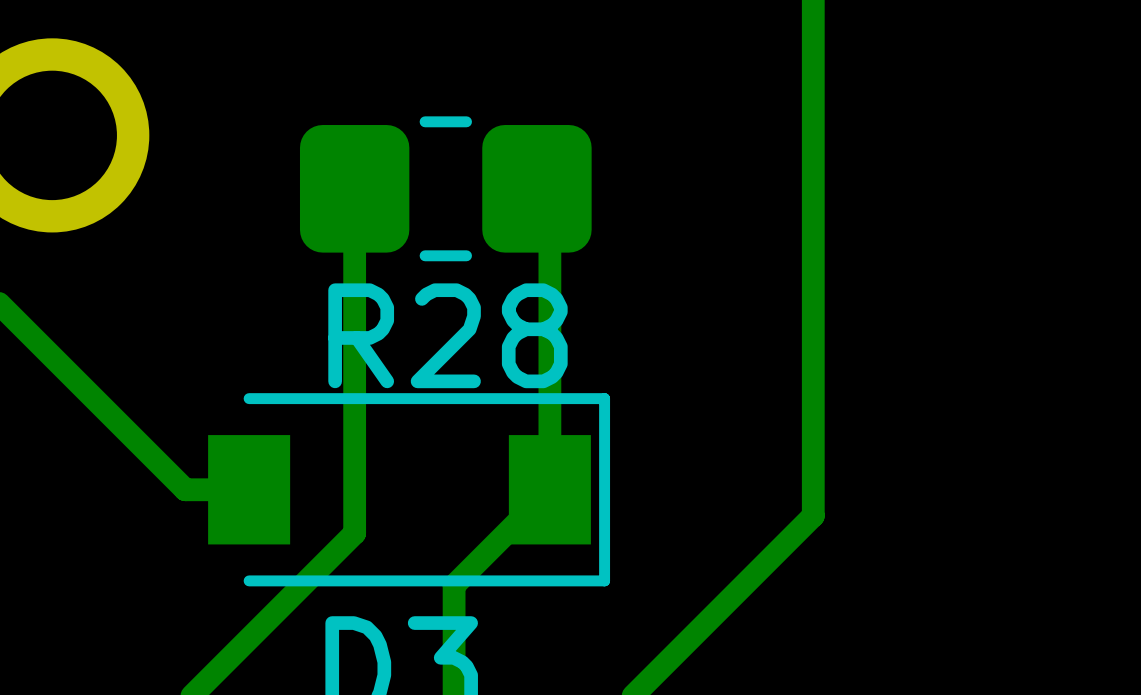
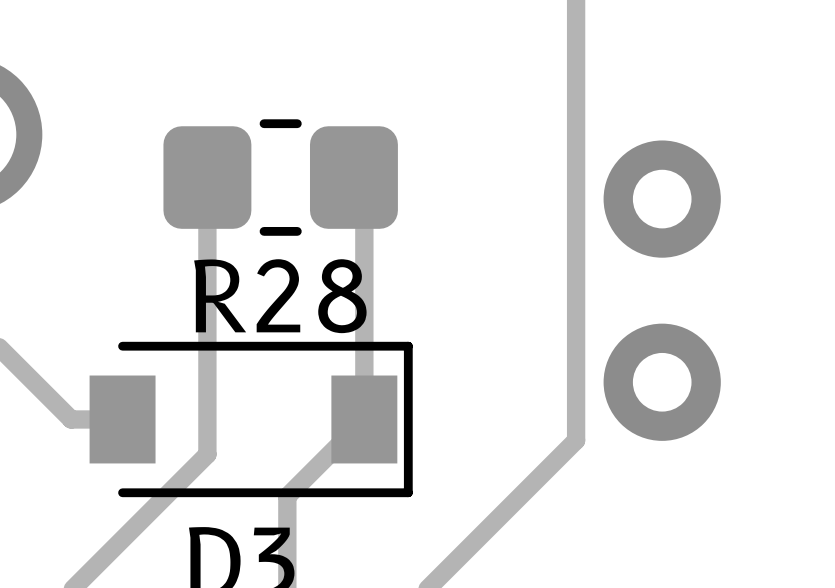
part: none -> (662, 290)

